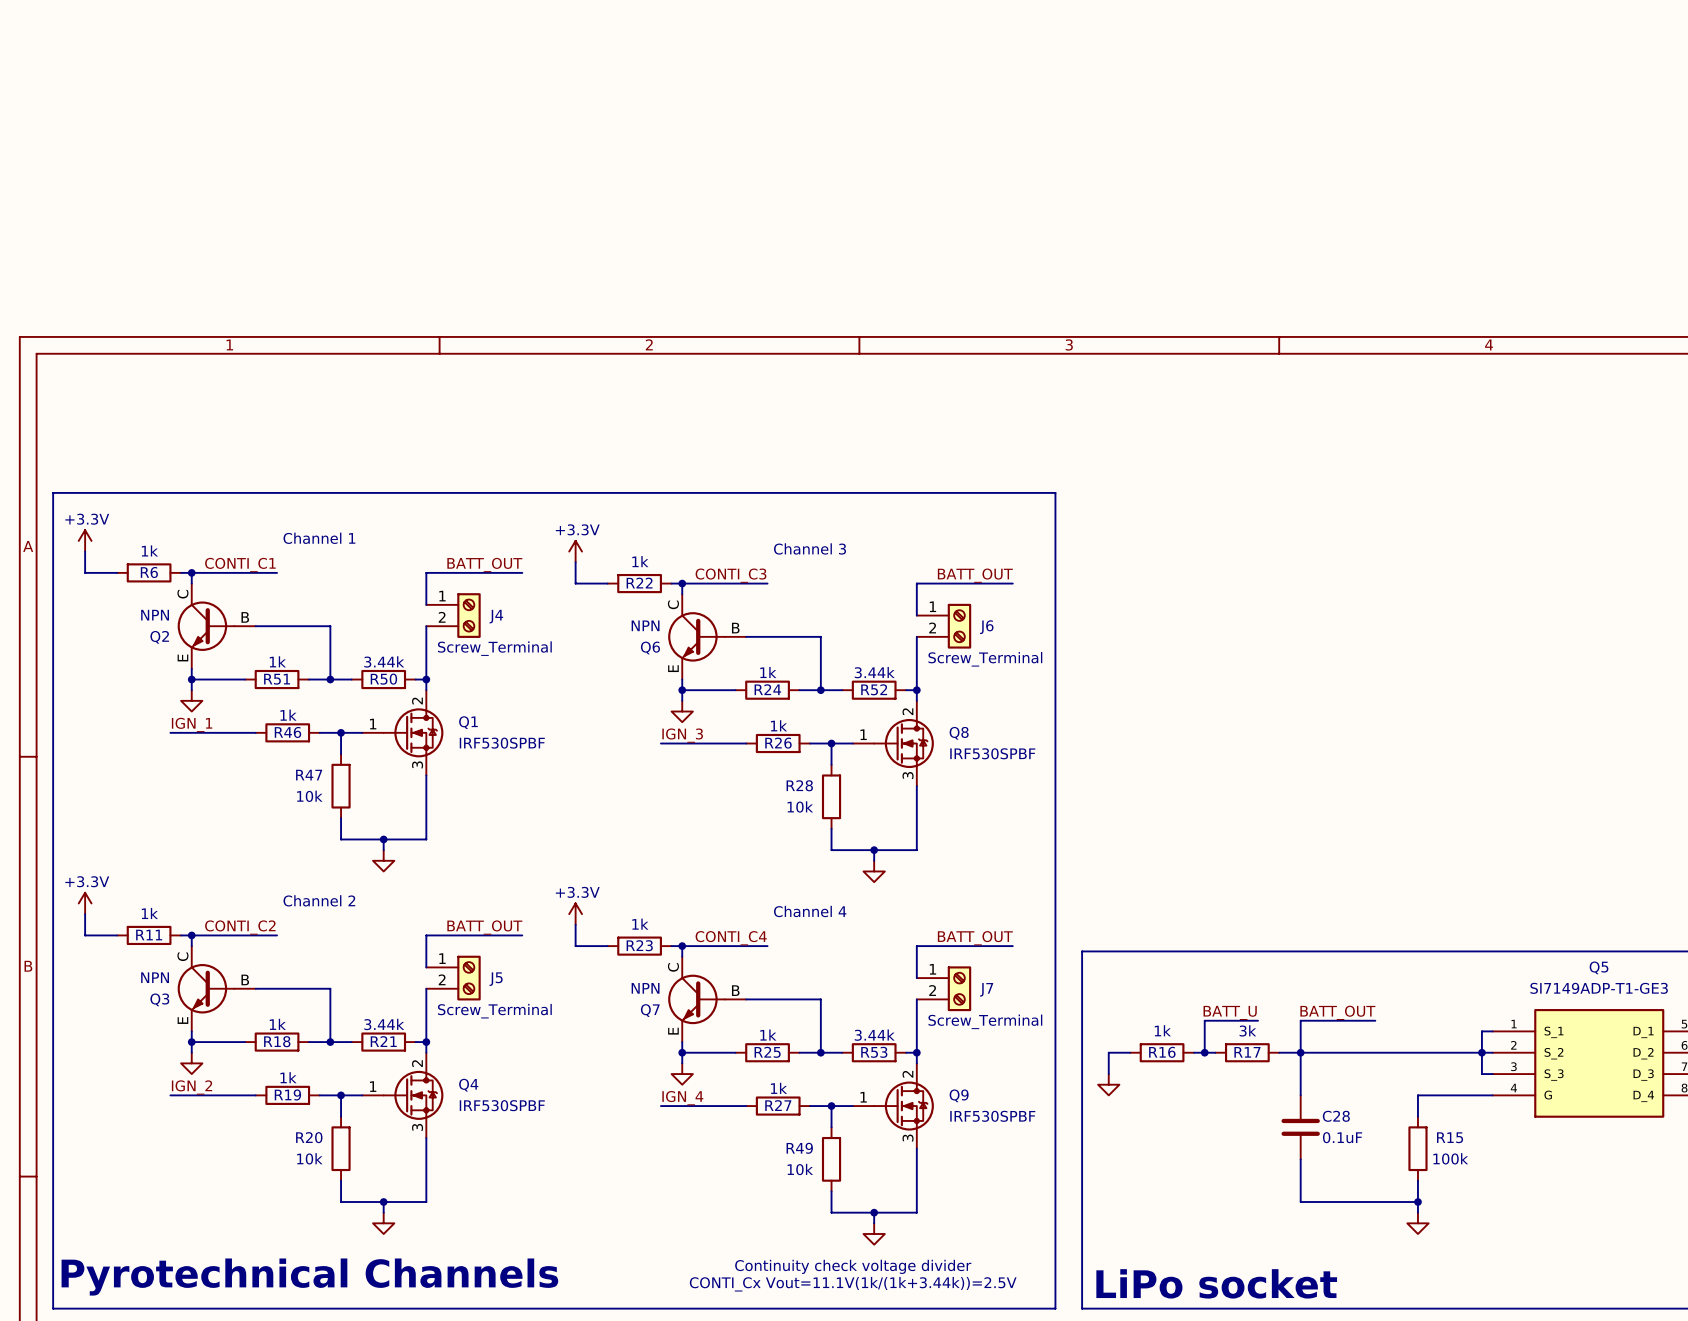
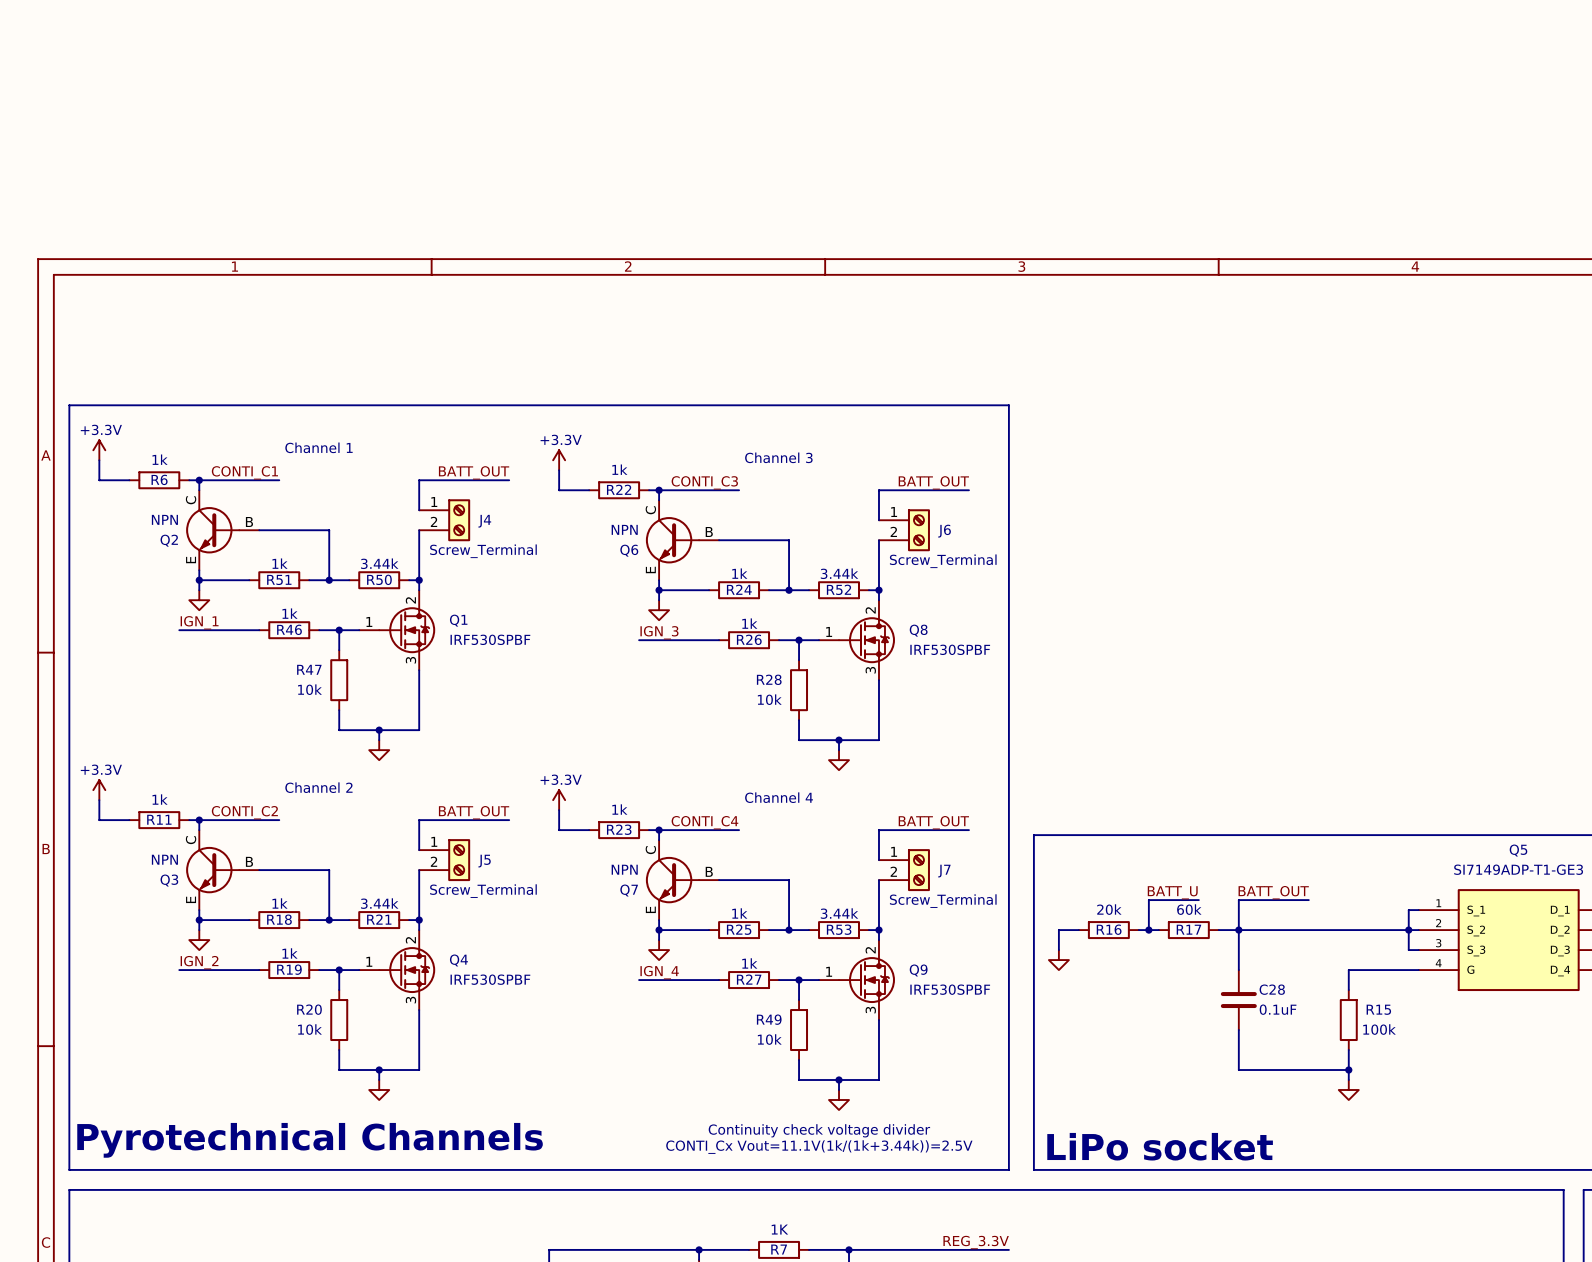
R16 value: 1k (1162, 1030) -> 20k (1109, 909)
R17 value: 3k (1247, 1030) -> 60k (1189, 909)

